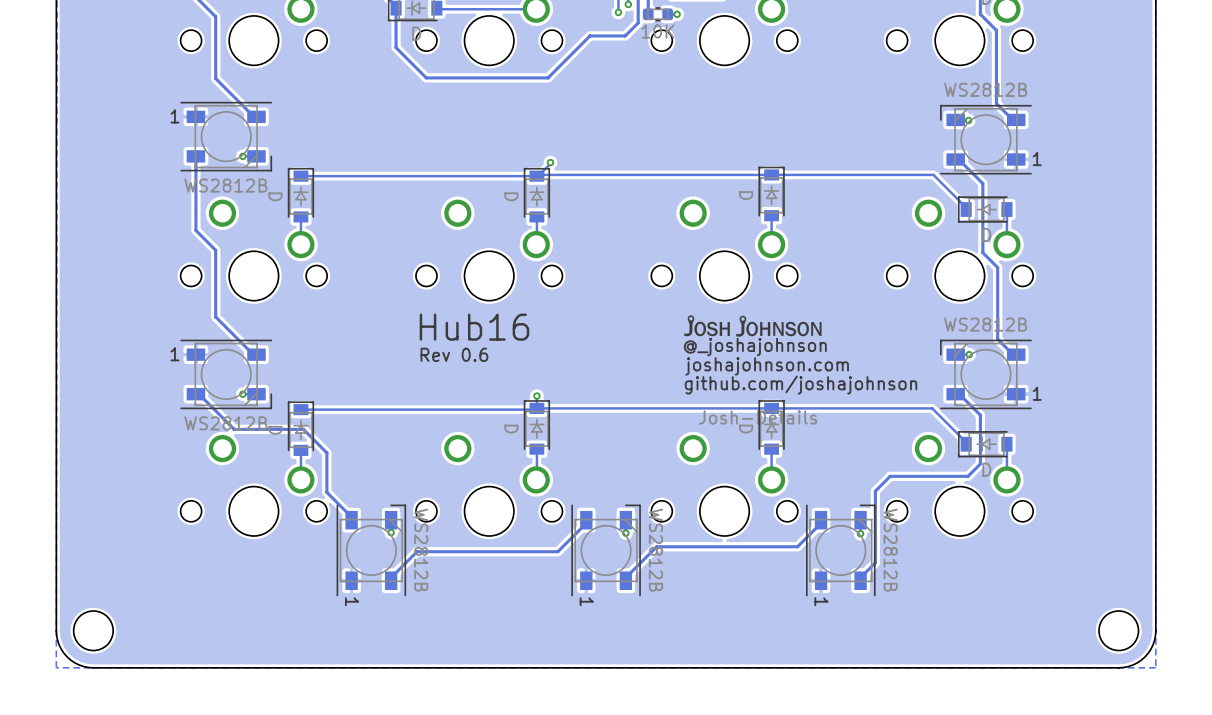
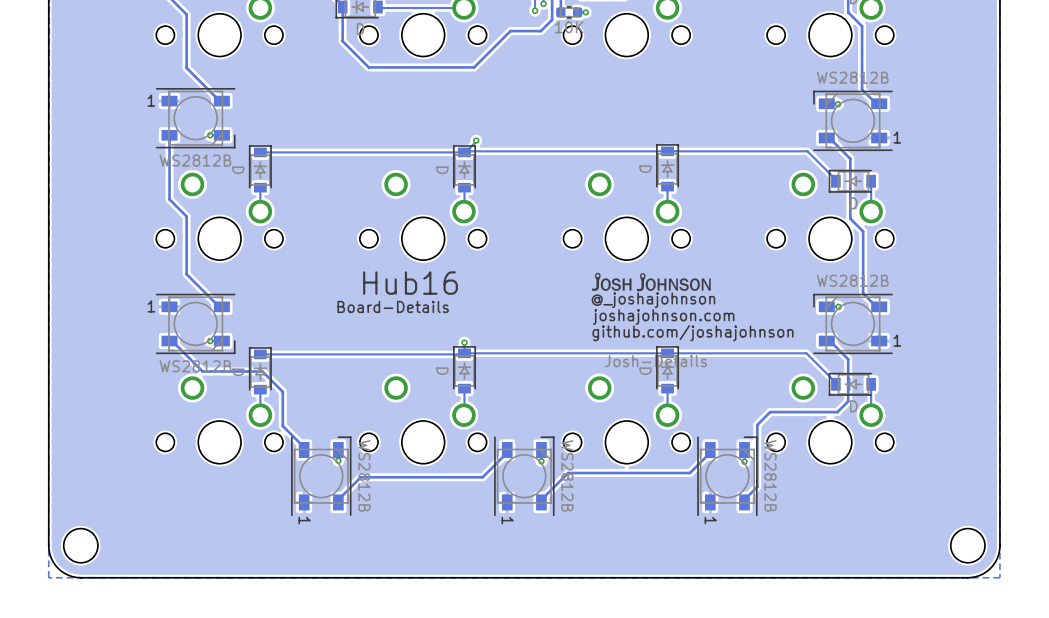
drawing: none -> [337, 271, 458, 314]
drawing: [419, 313, 530, 362] -> none

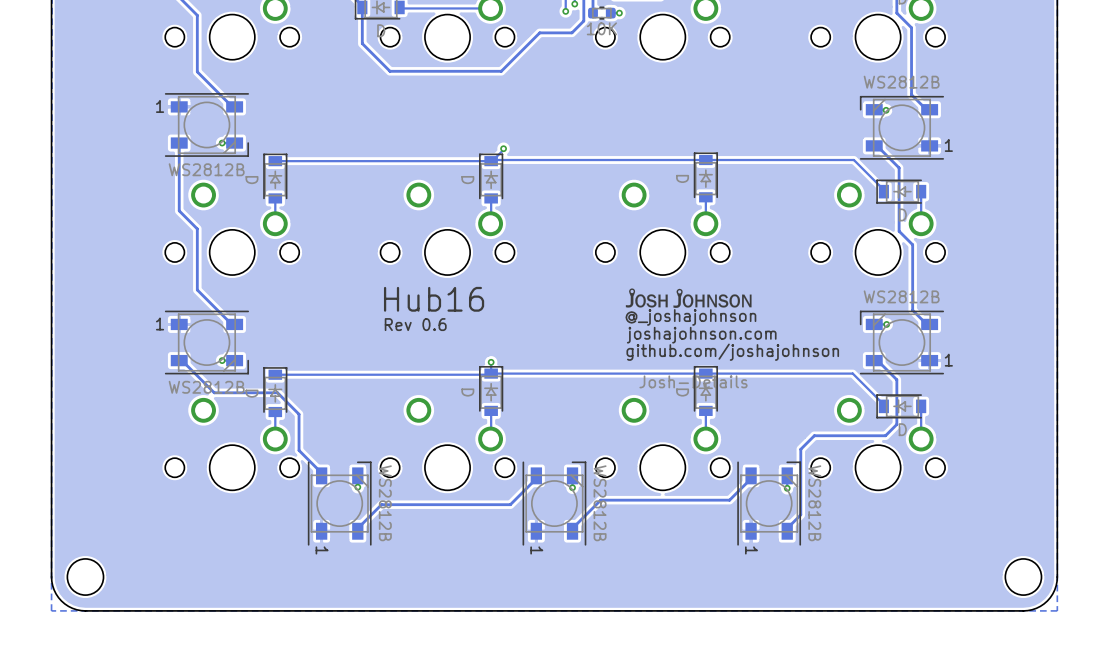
drawing: [337, 271, 458, 314] -> none
drawing: none -> [383, 286, 485, 332]

